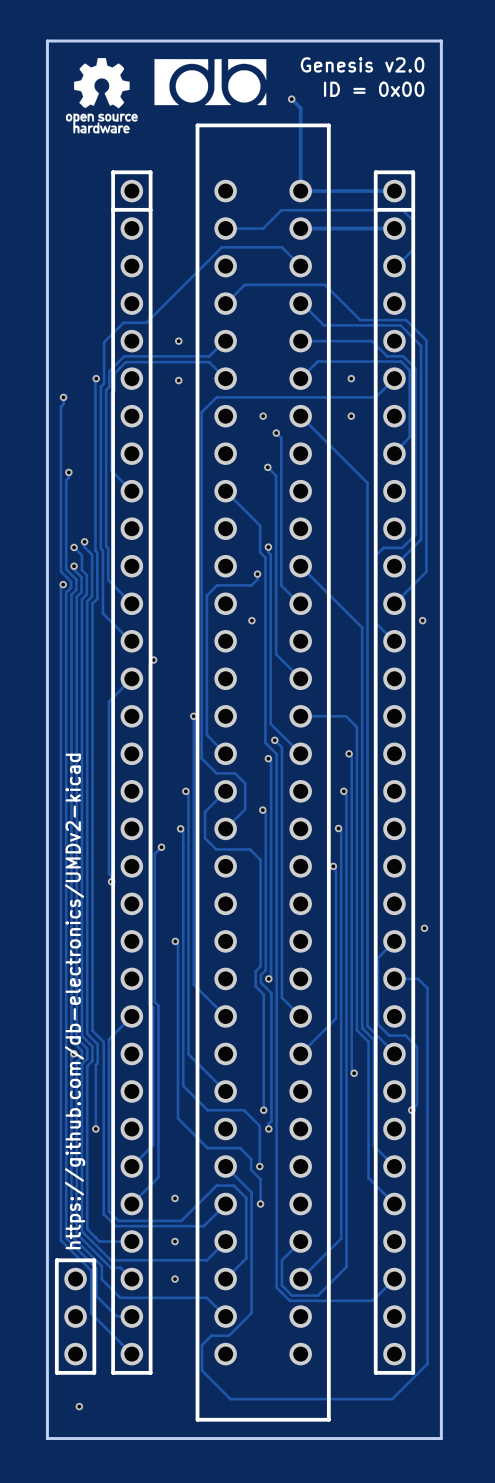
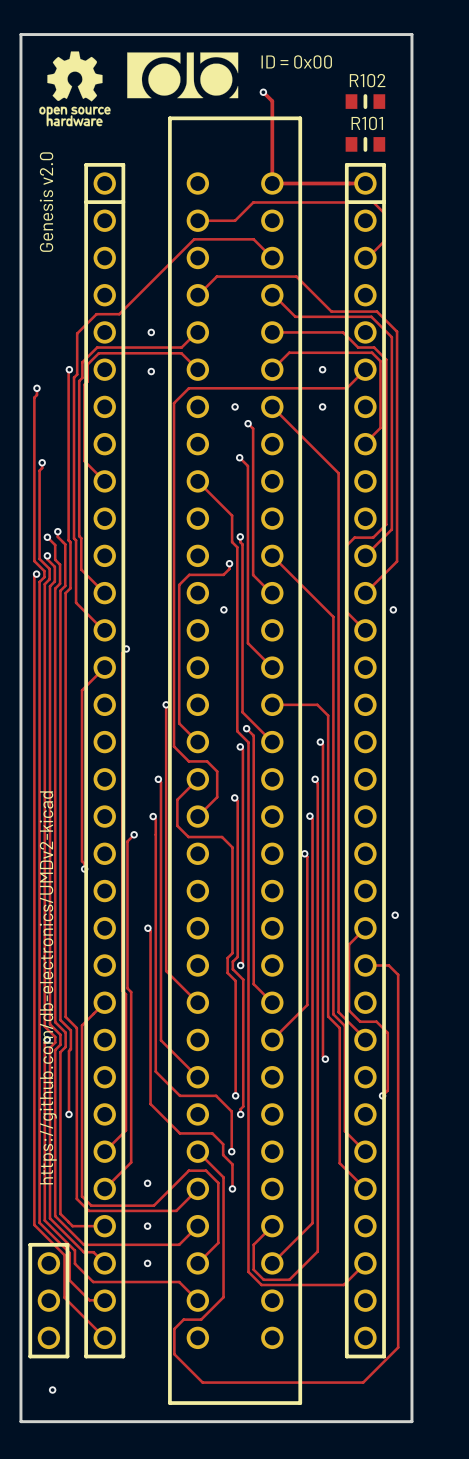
text rotation: 0° (362, 64) -> 90° counterclockwise (46, 202)
text position: Genesis v2.0 (362, 64) -> Genesis v2.0 (46, 202)
text position: ID = 0x00 (374, 89) -> ID = 0x00 (296, 61)
R102: none -> (365, 101)
R101: none -> (365, 144)
track: (300, 228) (394, 228) -> none

